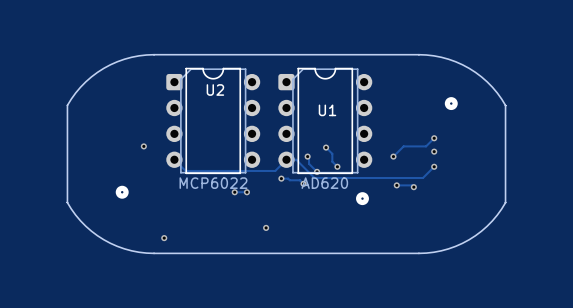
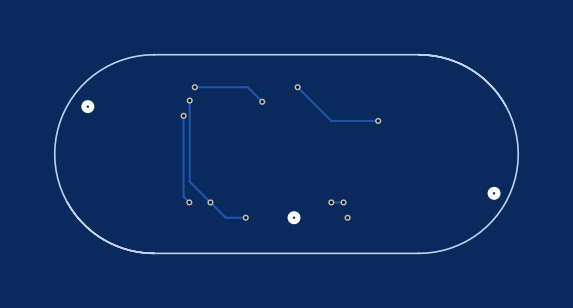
board edge: (154, 54) (124, 59) (103, 68) (85, 81) (67, 105) (67, 202) -> (154, 54) (129, 57) (114, 63) (86, 80) (75, 93) (63, 114) (56, 137) (54, 154) (56, 170) (63, 193) (75, 215) (86, 227) (114, 245) (129, 250) (154, 253)
track: none -> (194, 87) (247, 87) (262, 101)
via: none -> (194, 87)
track: none -> (297, 87) (331, 120) (378, 120)
via: none -> (297, 87)
track: none -> (189, 100) (189, 181) (225, 217) (245, 217)
via: none -> (189, 100)
via: none -> (262, 101)
part: (451, 103) -> none
board edge: (505, 105) (505, 202) (487, 226) (469, 239) (441, 250) (418, 253) -> (418, 54) (443, 57) (458, 63) (479, 75) (492, 86) (502, 99) (512, 121) (518, 154) (515, 178) (509, 193) (497, 215) (486, 227) (473, 237) (451, 248) (418, 253)
part: none -> (87, 106)
track: none -> (183, 115) (183, 196) (189, 202)
via: none -> (183, 115)
U2: MCP6022 (213, 120) -> none
U1: AD620 (325, 120) -> none
via: none -> (378, 120)
track: (434, 138) (426, 146) (403, 146) (393, 156) -> none
via: (434, 138) -> none
via: (143, 146) -> none
track: (326, 147) (332, 153) (332, 161) (337, 166) -> none
via: (326, 147) -> none
via: (434, 151) -> none
track: (307, 156) (309, 163) (317, 171) -> none
via: (307, 156) -> none
via: (393, 156) -> none
track: (174, 159) (185, 170) (275, 170) (286, 159) (296, 159) (314, 178) (422, 178) (434, 166) -> none
via: (337, 166) -> none
via: (434, 166) -> none
via: (317, 171) -> none
track: (281, 178) (300, 180) (303, 183) -> none
via: (281, 178) -> none
via: (303, 183) -> none
track: (396, 185) (412, 185) (413, 187) -> none
via: (396, 185) -> none
via: (413, 187) -> none
part: (122, 192) -> none
via: (234, 192) -> none
track: (246, 192) (234, 192) -> (343, 202) (331, 202)
via: (246, 192) -> none
part: none -> (494, 193)
part: (362, 198) -> none
via: none -> (189, 202)
via: none -> (210, 202)
via: none -> (331, 202)
via: none -> (343, 202)
via: none -> (245, 217)
part: none -> (294, 217)
via: none -> (347, 217)
via: (266, 227) -> none
via: (164, 238) -> none

